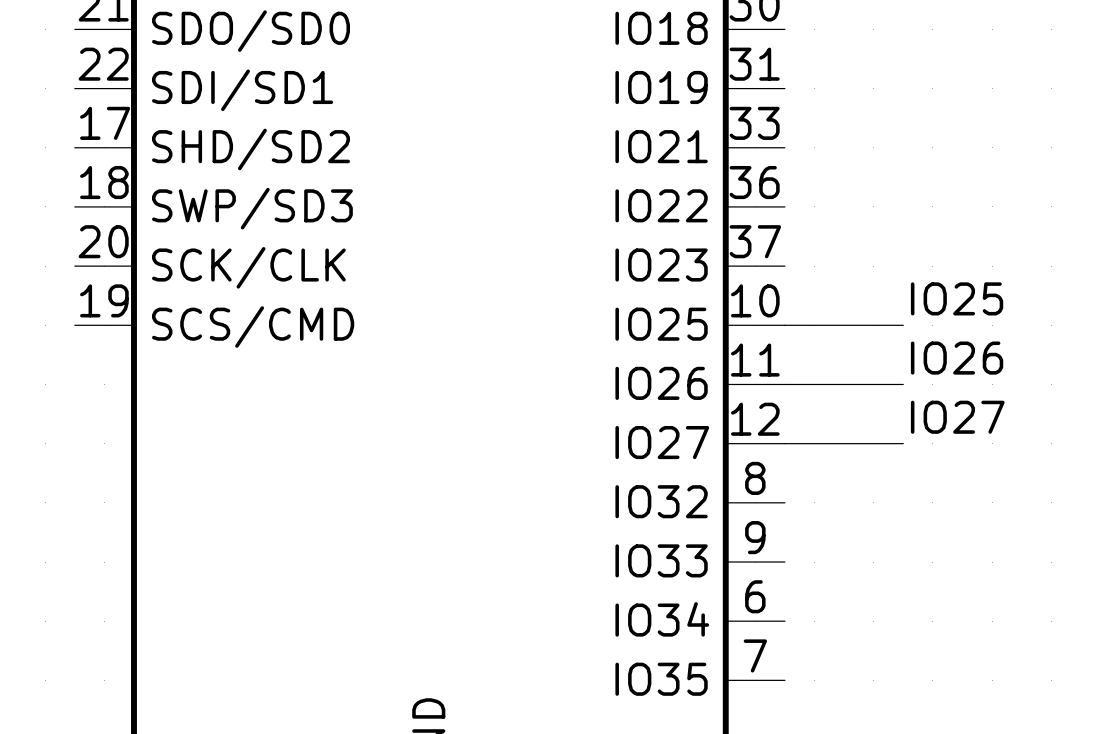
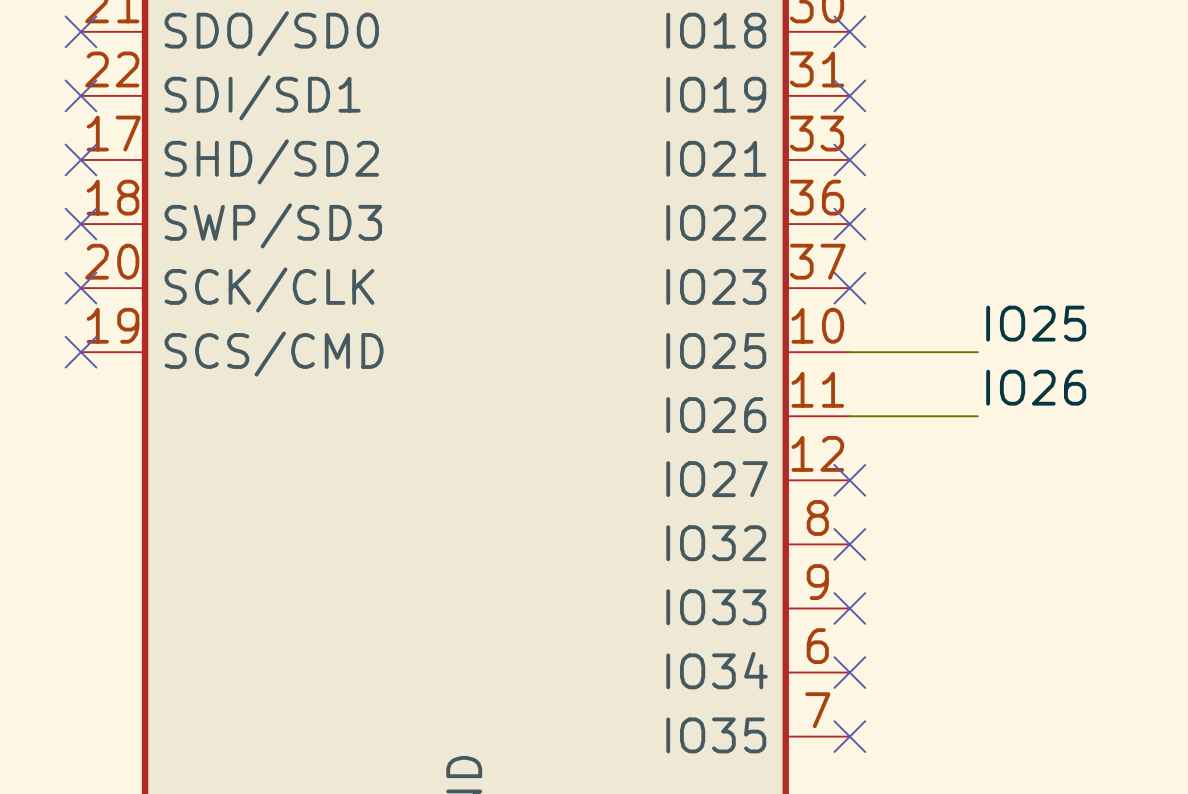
no-connect mark: none -> (80, 31)
no-connect mark: none -> (849, 31)
no-connect mark: none -> (80, 95)
no-connect mark: none -> (849, 95)
no-connect mark: none -> (80, 159)
no-connect mark: none -> (849, 159)
no-connect mark: none -> (80, 224)
no-connect mark: none -> (849, 224)
no-connect mark: none -> (80, 288)
no-connect mark: none -> (849, 288)
no-connect mark: none -> (80, 352)
label: IO27 (957, 417) -> none
wire: (784, 443) (903, 443) -> none
no-connect mark: none -> (849, 480)
no-connect mark: none -> (849, 544)
no-connect mark: none -> (849, 608)
no-connect mark: none -> (849, 672)
no-connect mark: none -> (849, 736)

